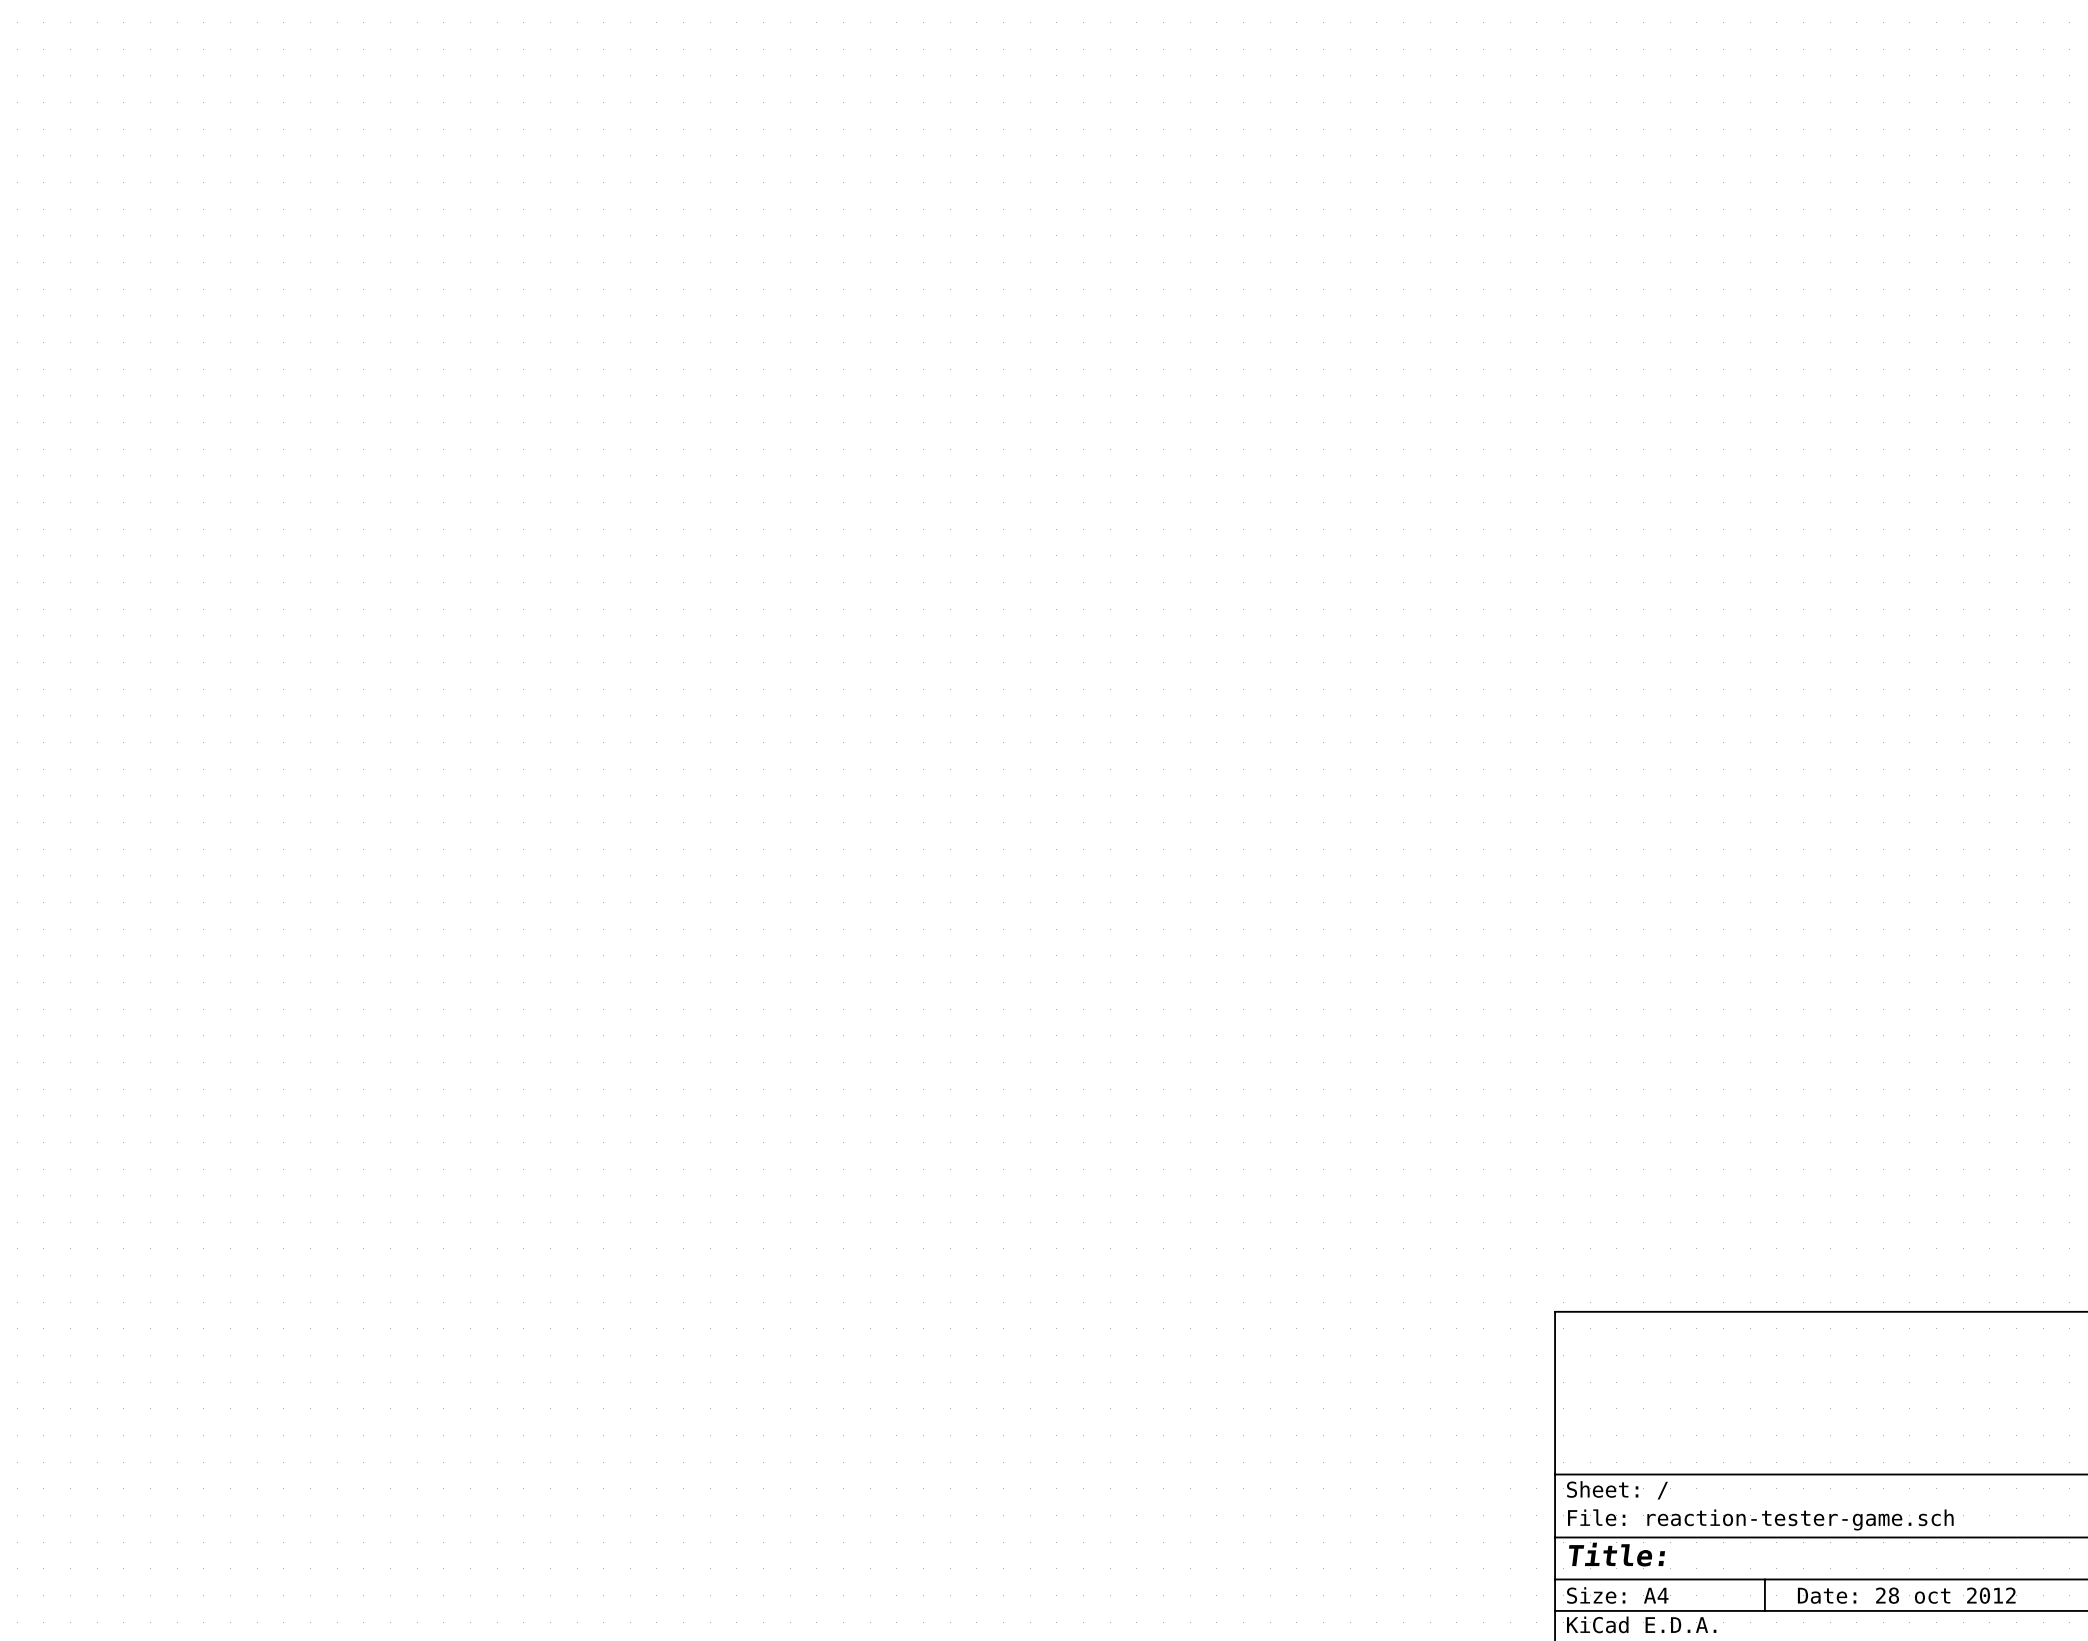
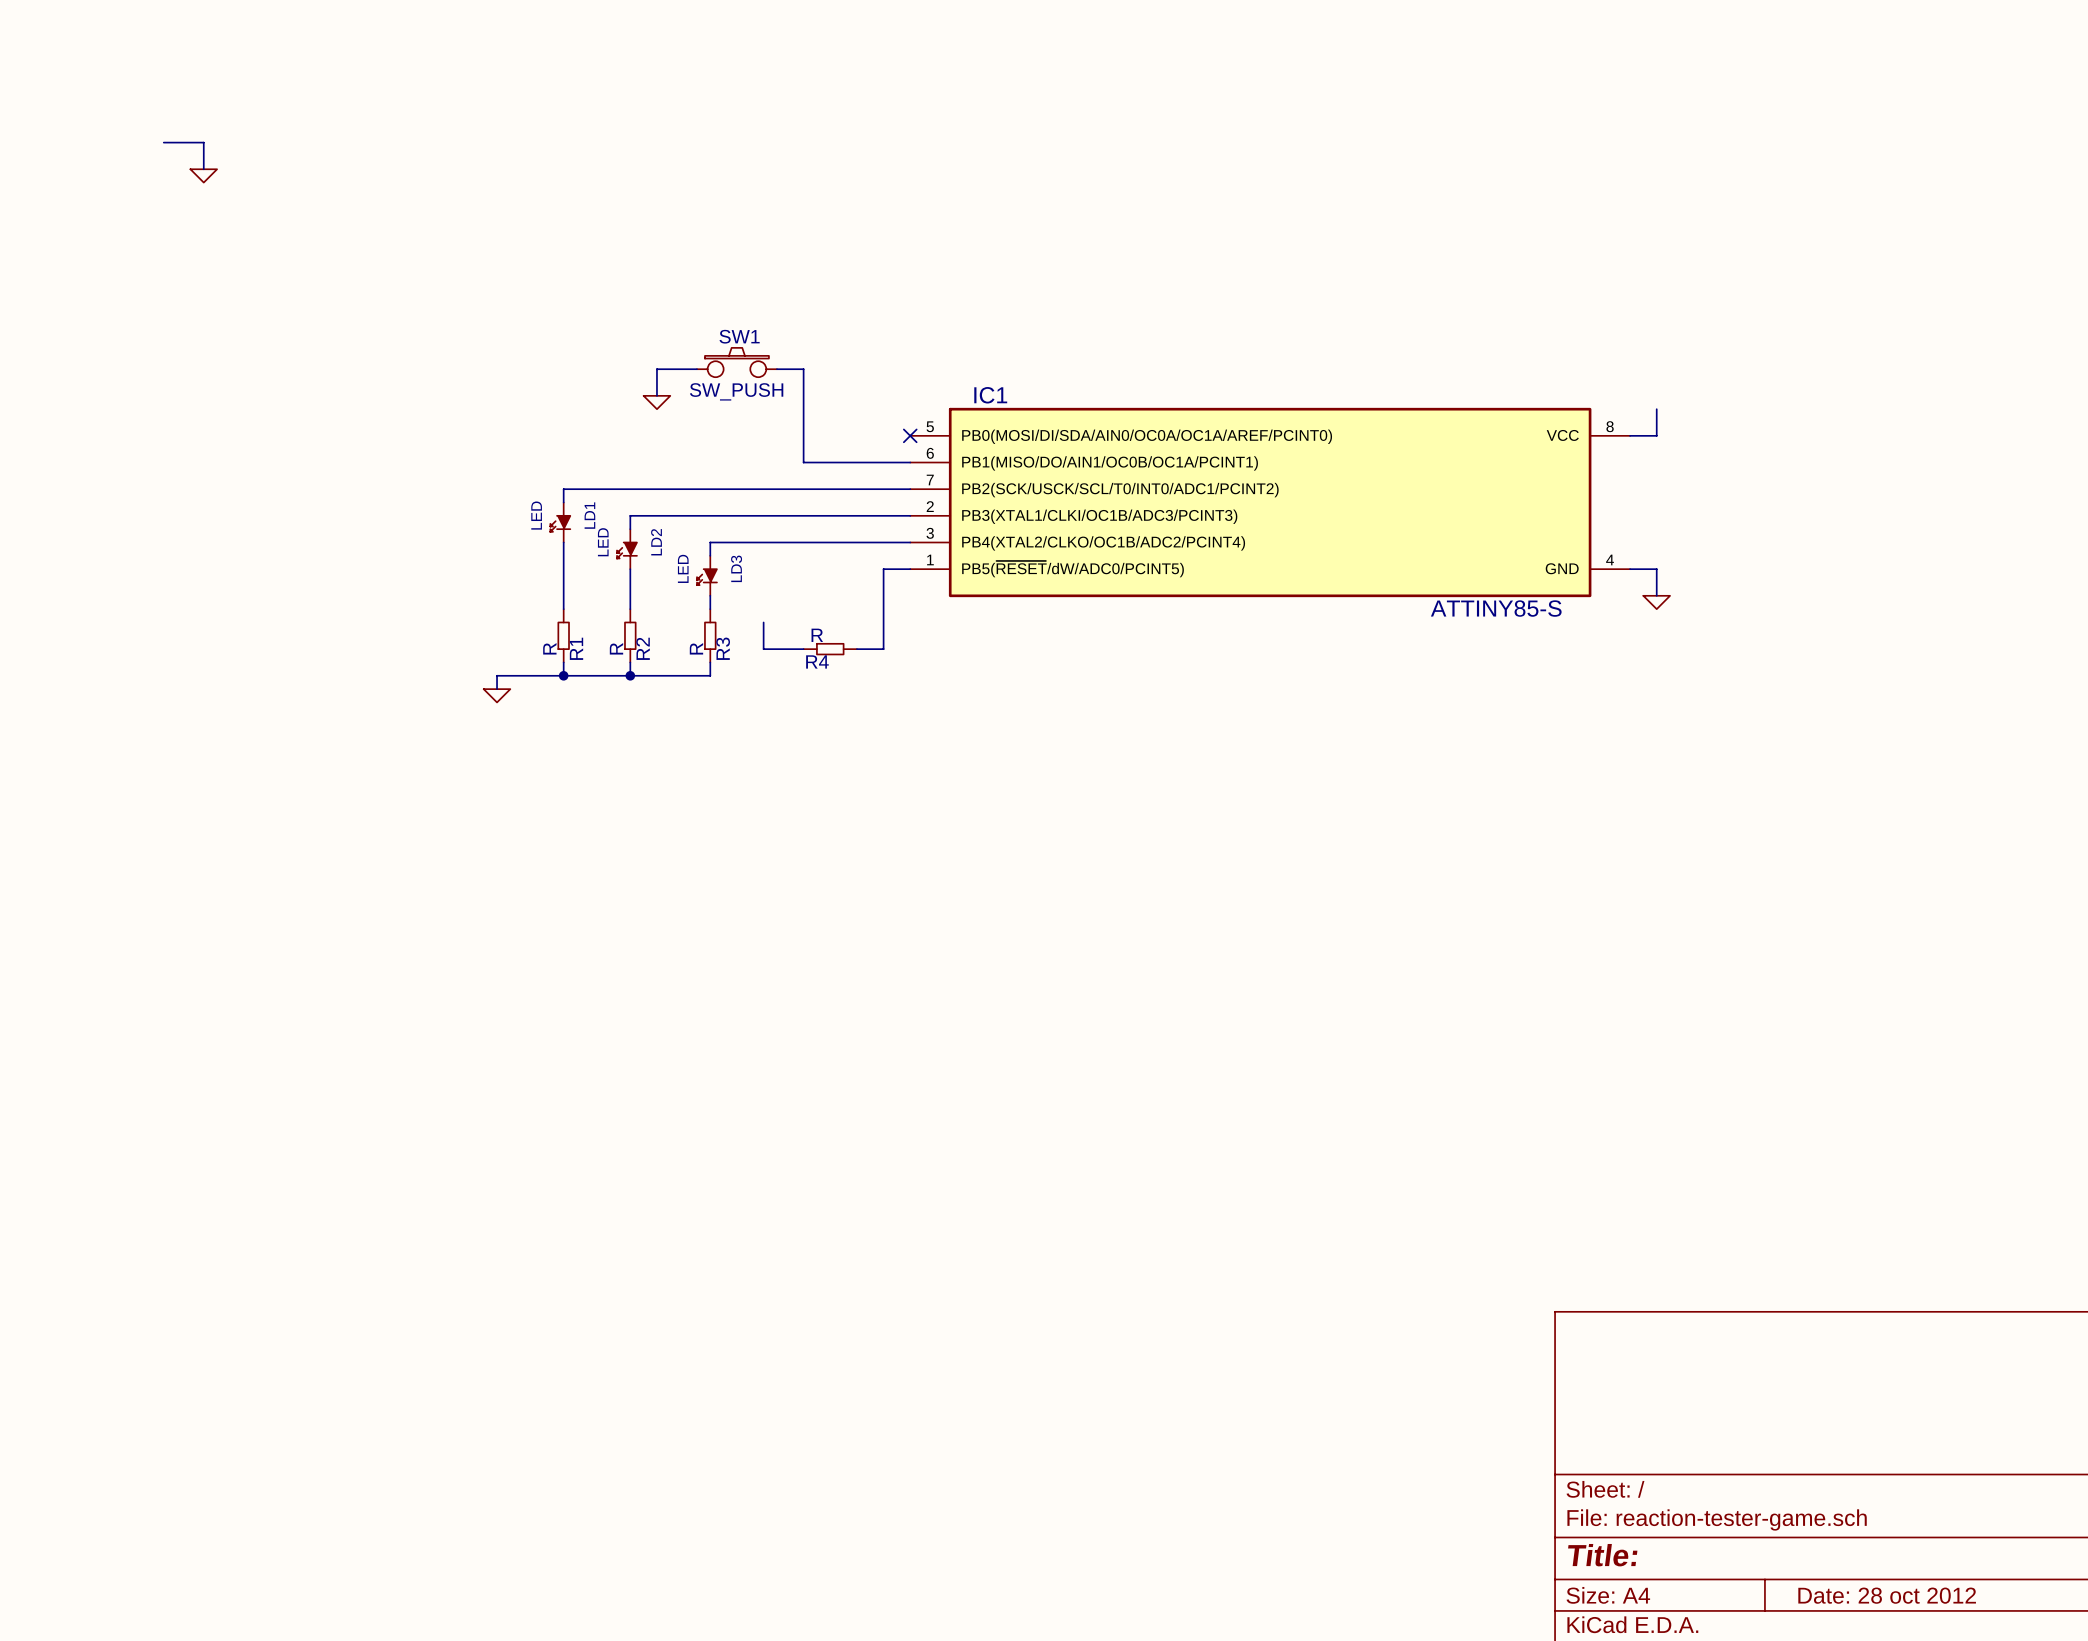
wire: none -> (163, 142) (203, 142) (203, 169)
power symbol: none -> (203, 175)
SW1: none -> SW_PUSH (736, 362)
wire: none -> (696, 369) (656, 369) (656, 395)
wire: none -> (776, 369) (803, 369) (803, 462) (910, 462)
power symbol: none -> (656, 402)
wire: none -> (1656, 409) (1656, 435) (1630, 435)
no-connect mark: none -> (910, 435)
wire: none -> (910, 489) (563, 489) (563, 502)
IC1: none -> ATTINY85-S (1270, 502)
wire: none -> (910, 515) (630, 515) (630, 529)
LD1: none -> LED (560, 522)
wire: none -> (563, 542) (563, 609)
wire: none -> (910, 542) (710, 542) (710, 555)
LD2: none -> LED (626, 549)
wire: none -> (630, 569) (630, 609)
wire: none -> (910, 569) (883, 569) (883, 649) (856, 649)
wire: none -> (1630, 569) (1656, 569) (1656, 595)
LD3: none -> LED (706, 575)
wire: none -> (710, 595) (710, 609)
power symbol: none -> (1656, 602)
wire: none -> (763, 622) (763, 649) (803, 649)
R1: none -> R (563, 635)
R2: none -> R (630, 635)
R3: none -> R (710, 635)
R4: none -> R (830, 649)
wire: none -> (563, 662) (563, 675)
wire: none -> (630, 662) (630, 675)
wire: none -> (710, 662) (710, 675) (497, 675) (497, 689)
junction: none -> (563, 675)
junction: none -> (630, 675)
power symbol: none -> (497, 695)

